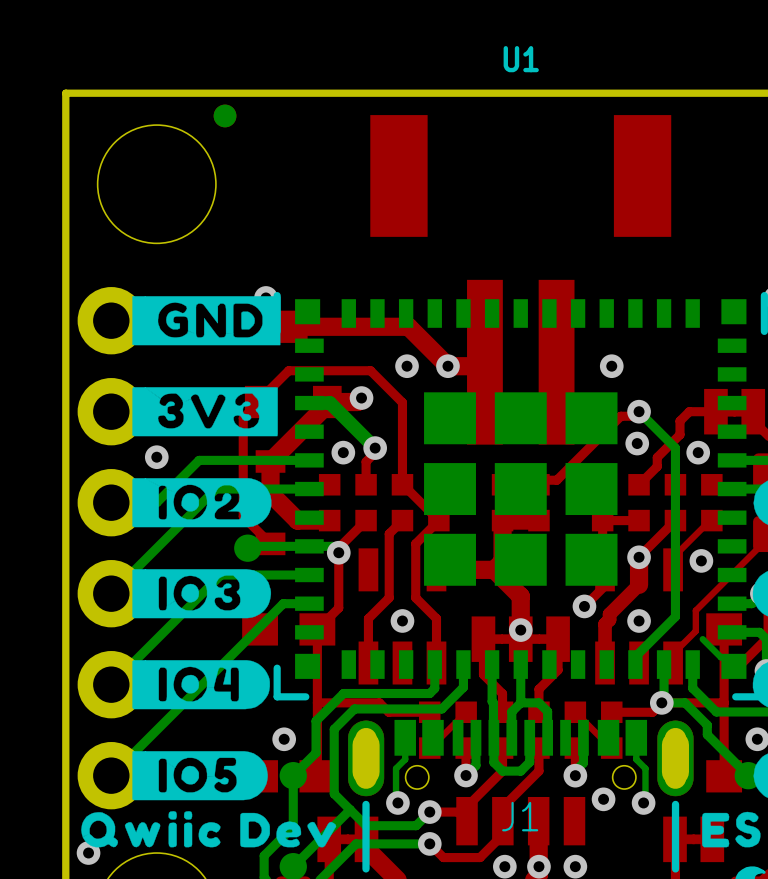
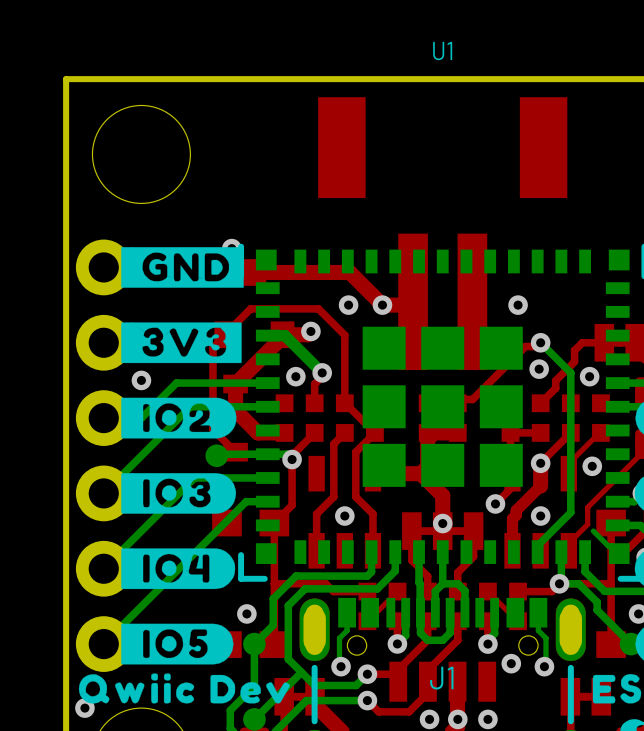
part: (225, 115) -> none

